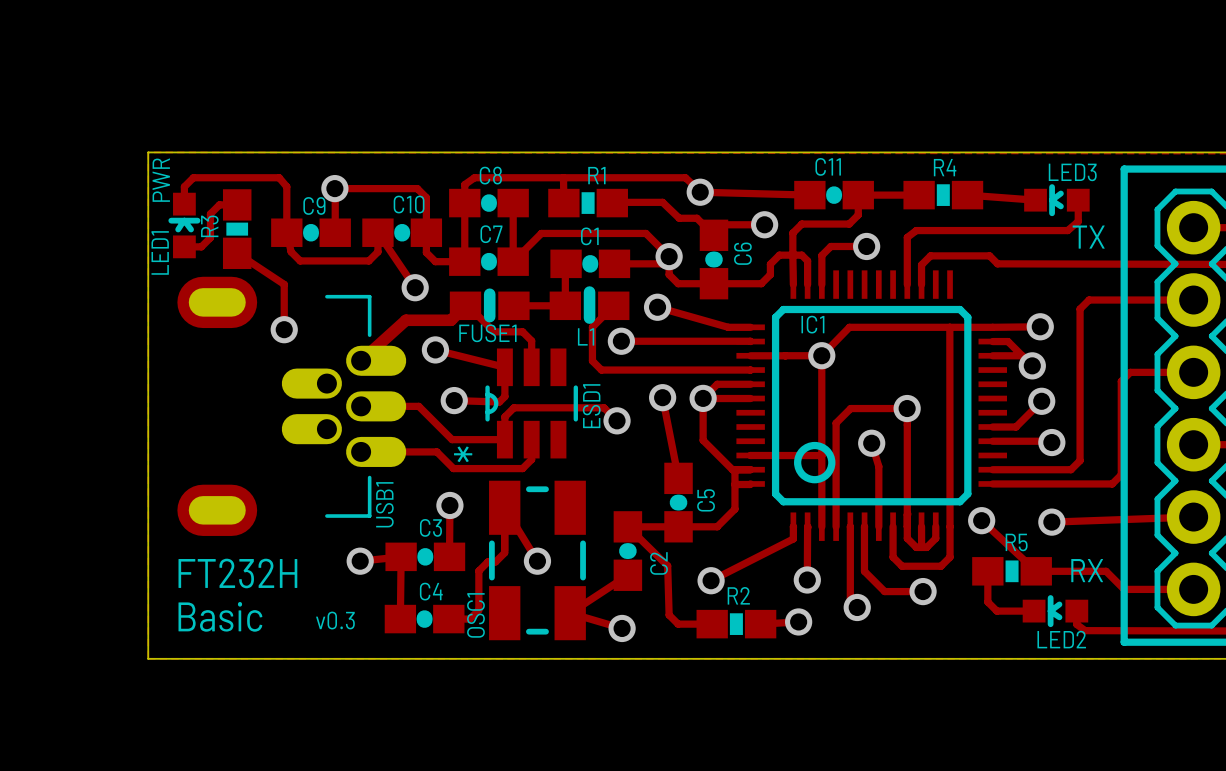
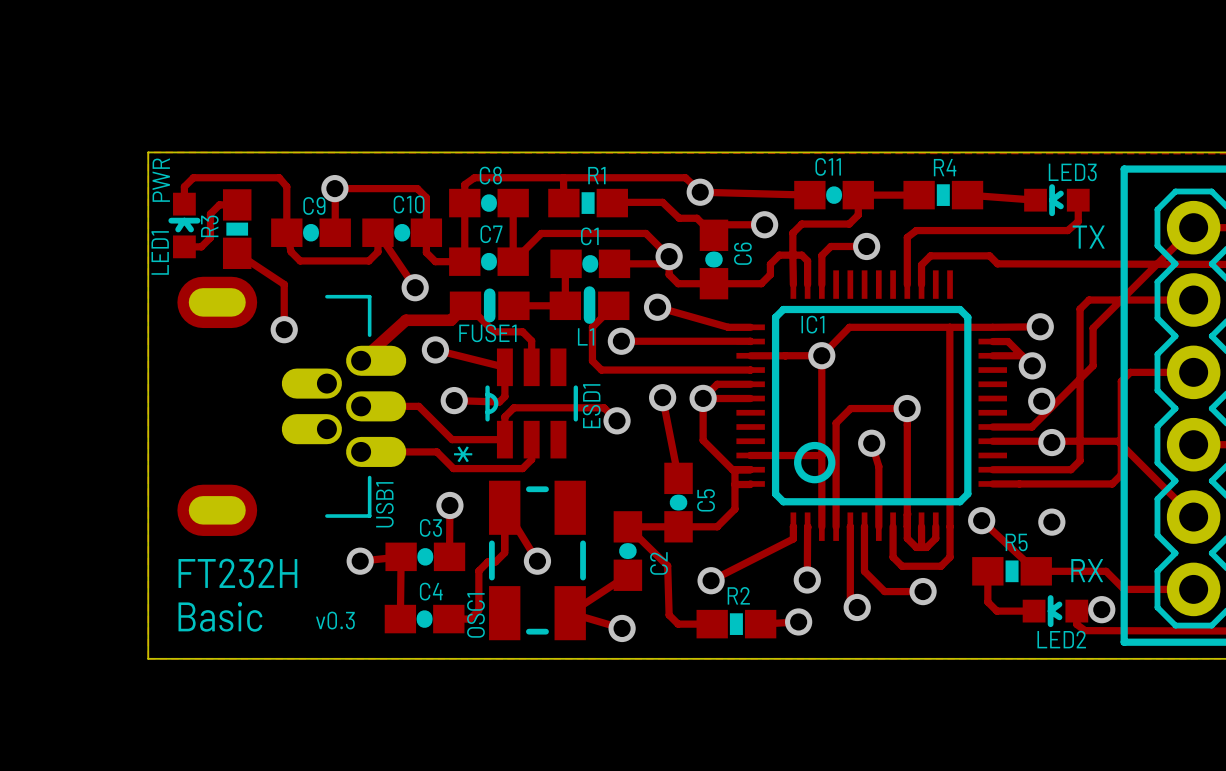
track: (1041, 401) (1016, 427) -> (1193, 227) (1093, 328) (1093, 365) (1031, 427) (1016, 427)
track: (1193, 517) (1051, 522) -> (1193, 517) (1117, 441) (1055, 441)
via: none -> (1101, 609)

